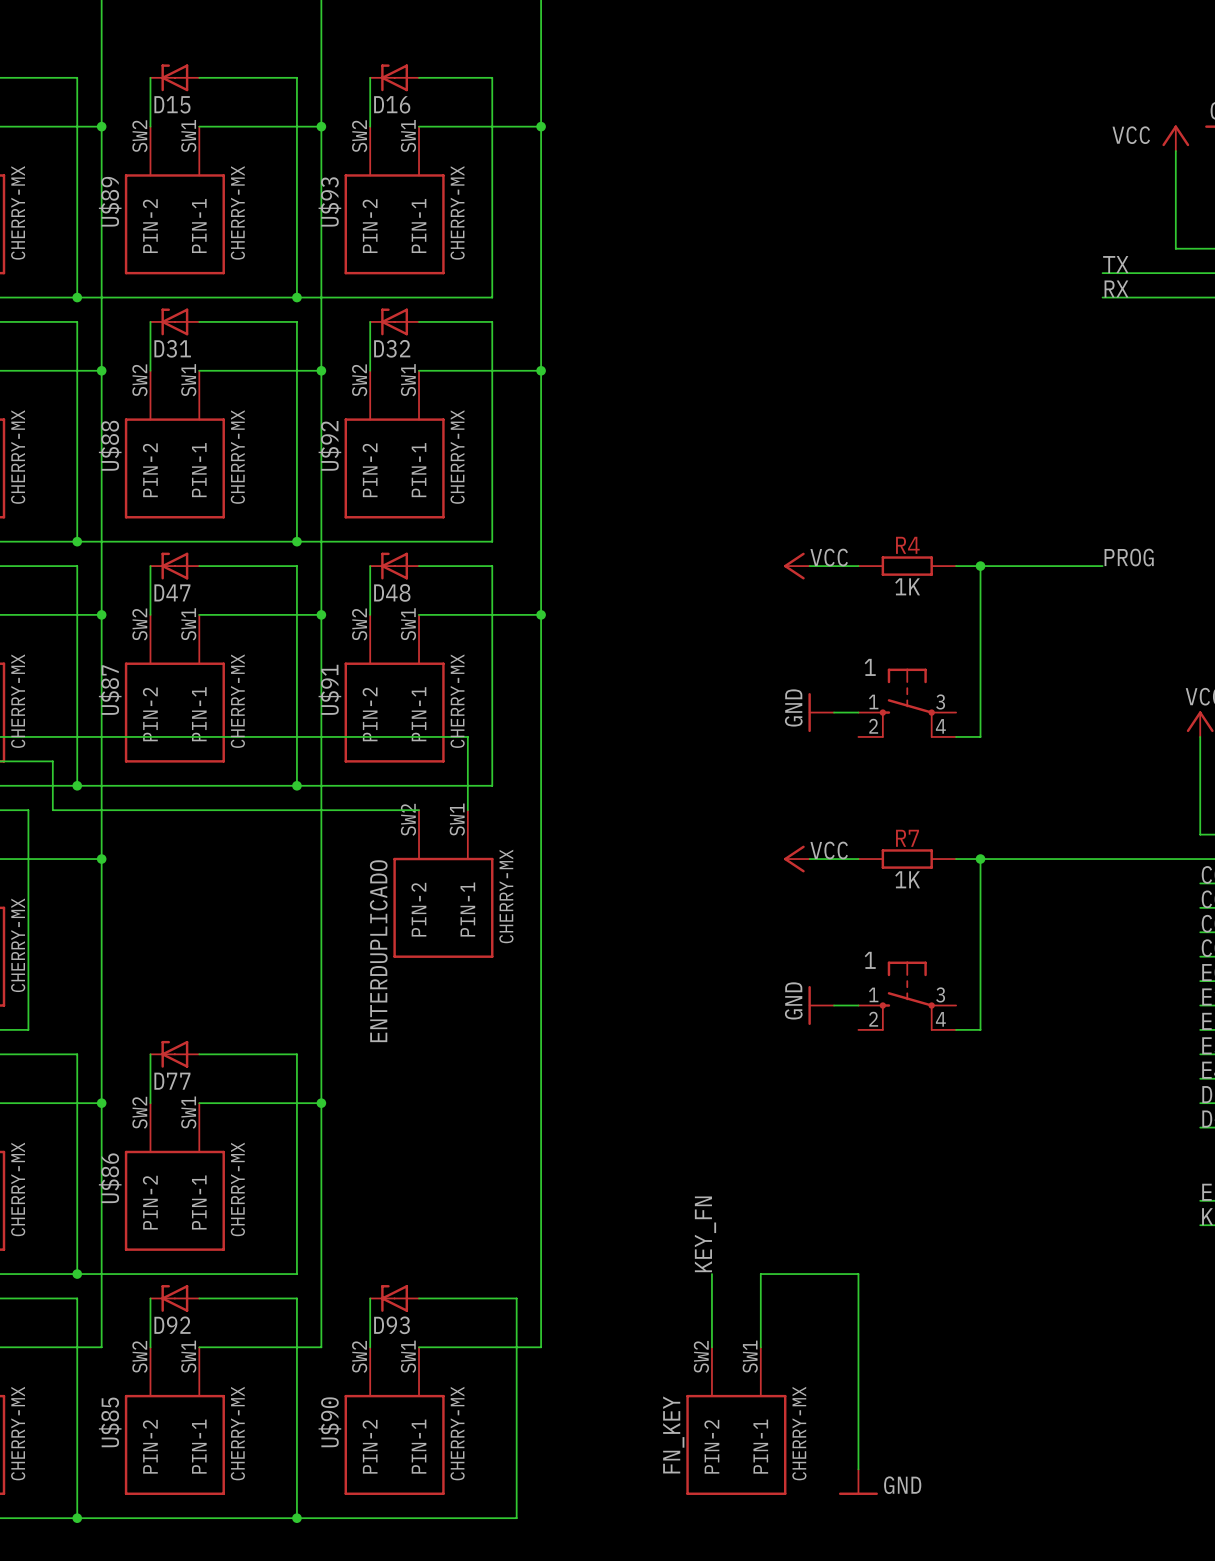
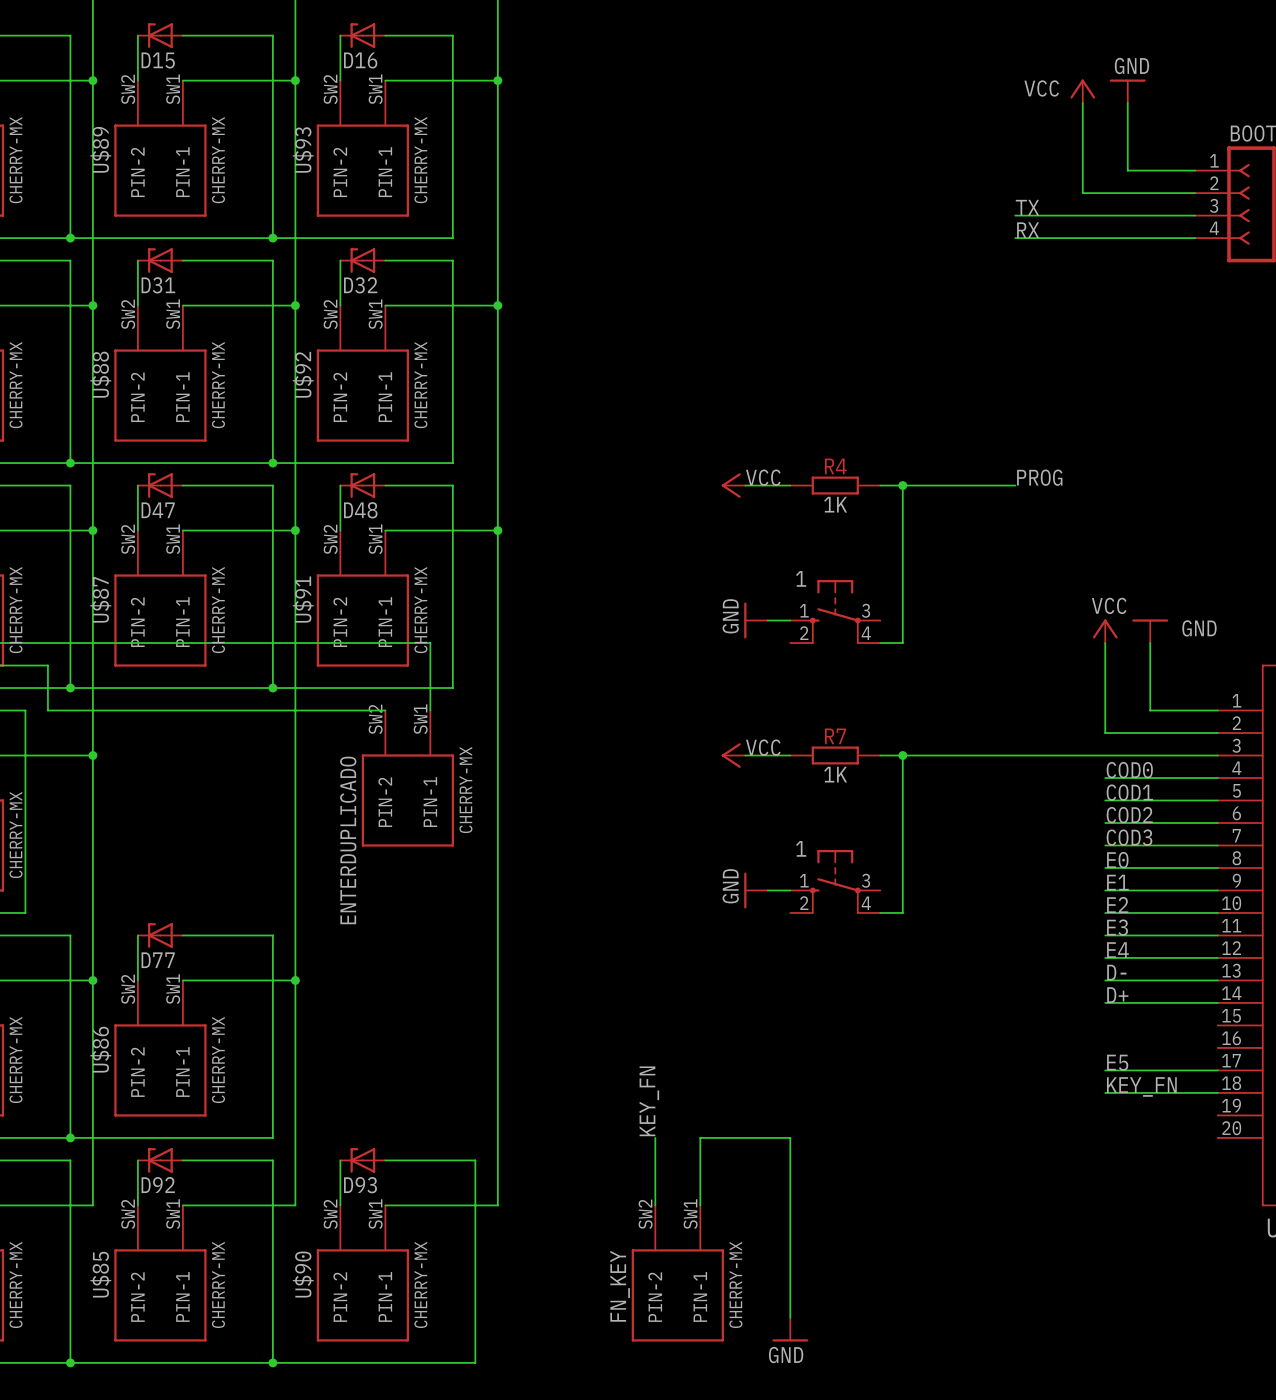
power symbol text position: GND (902, 1485) -> GND (786, 1355)

